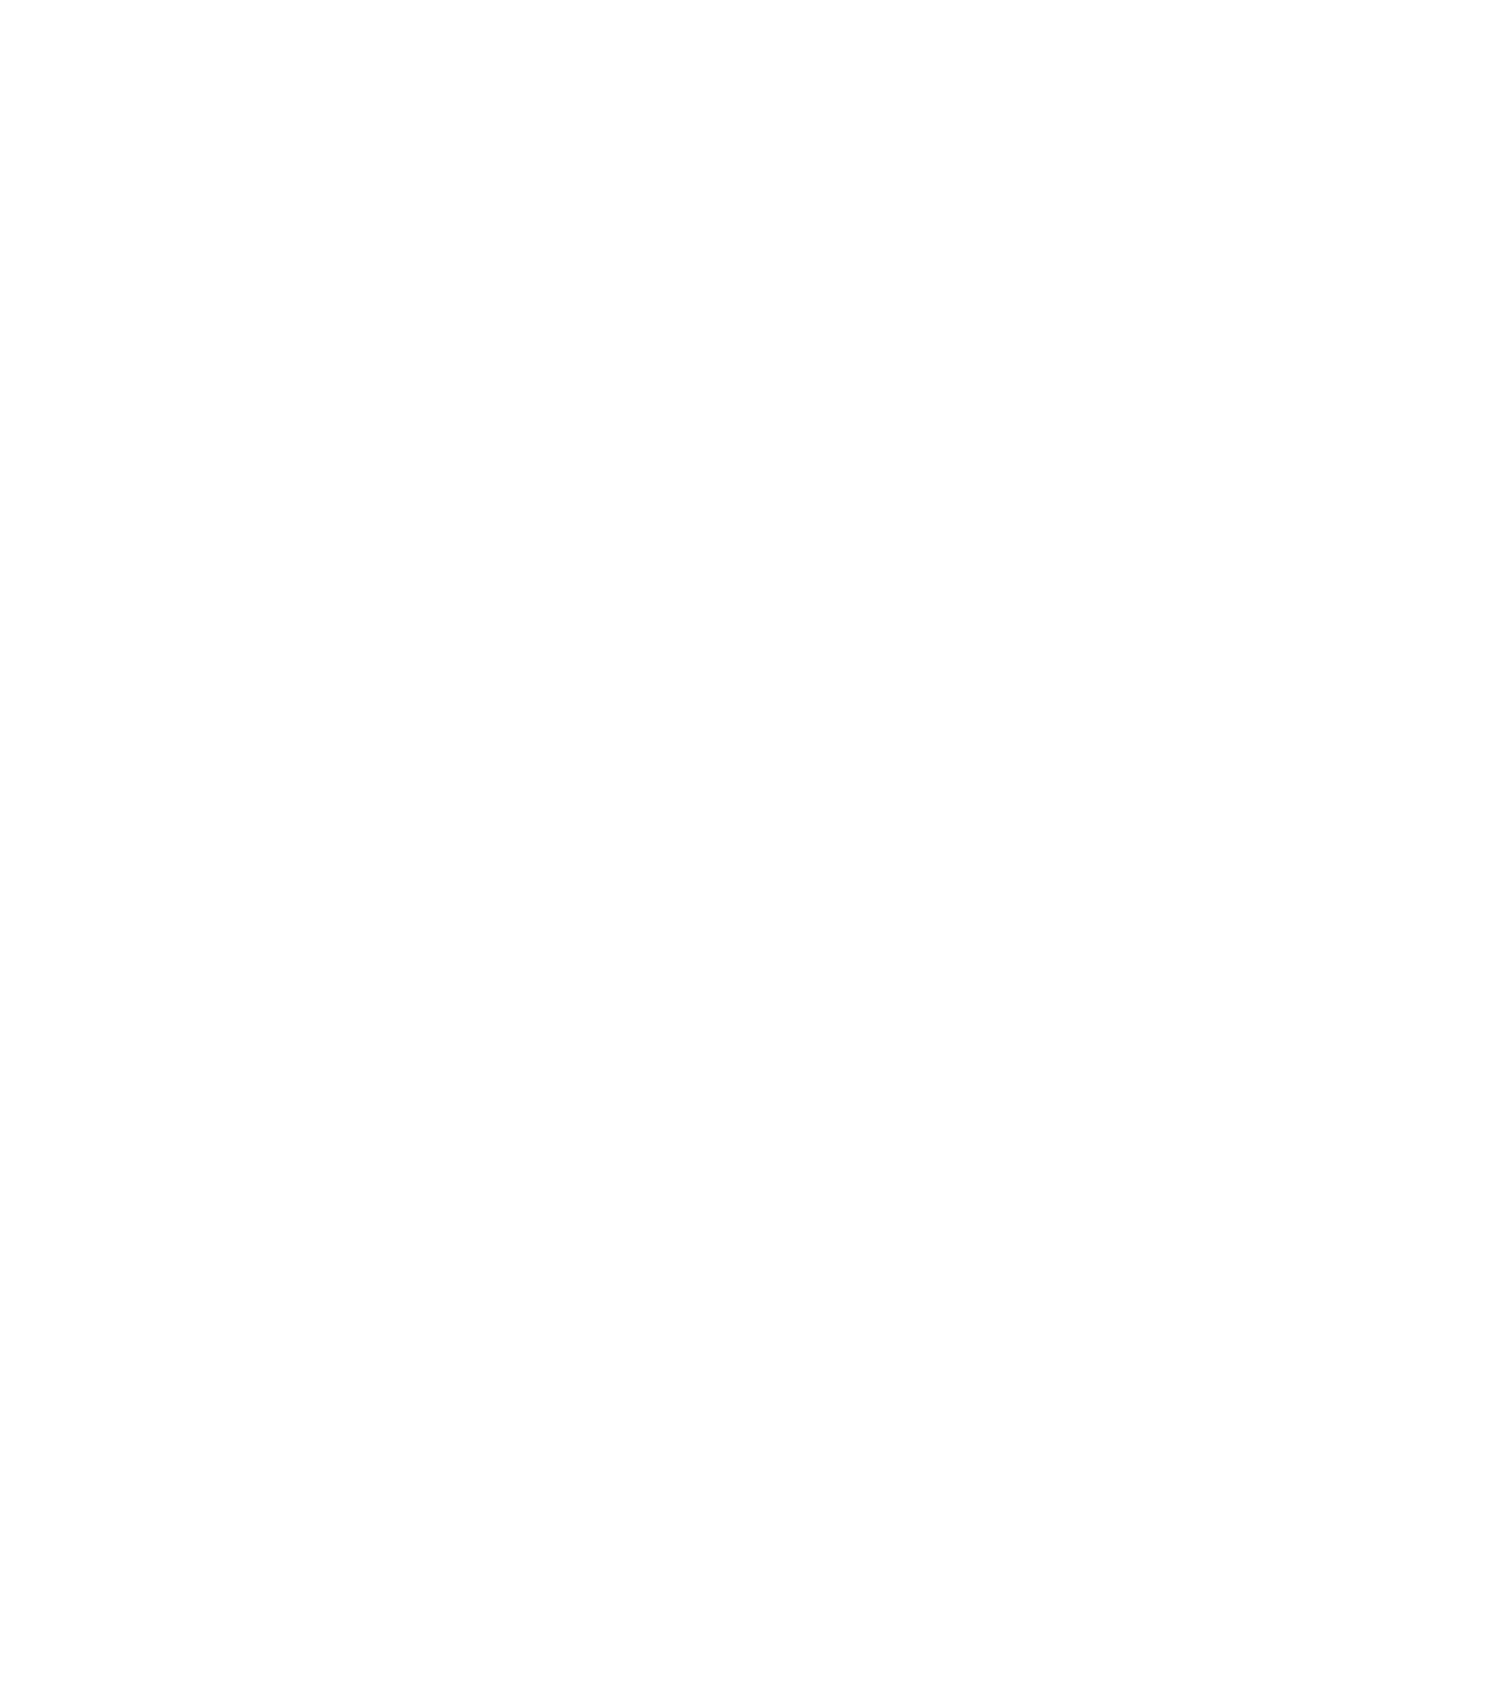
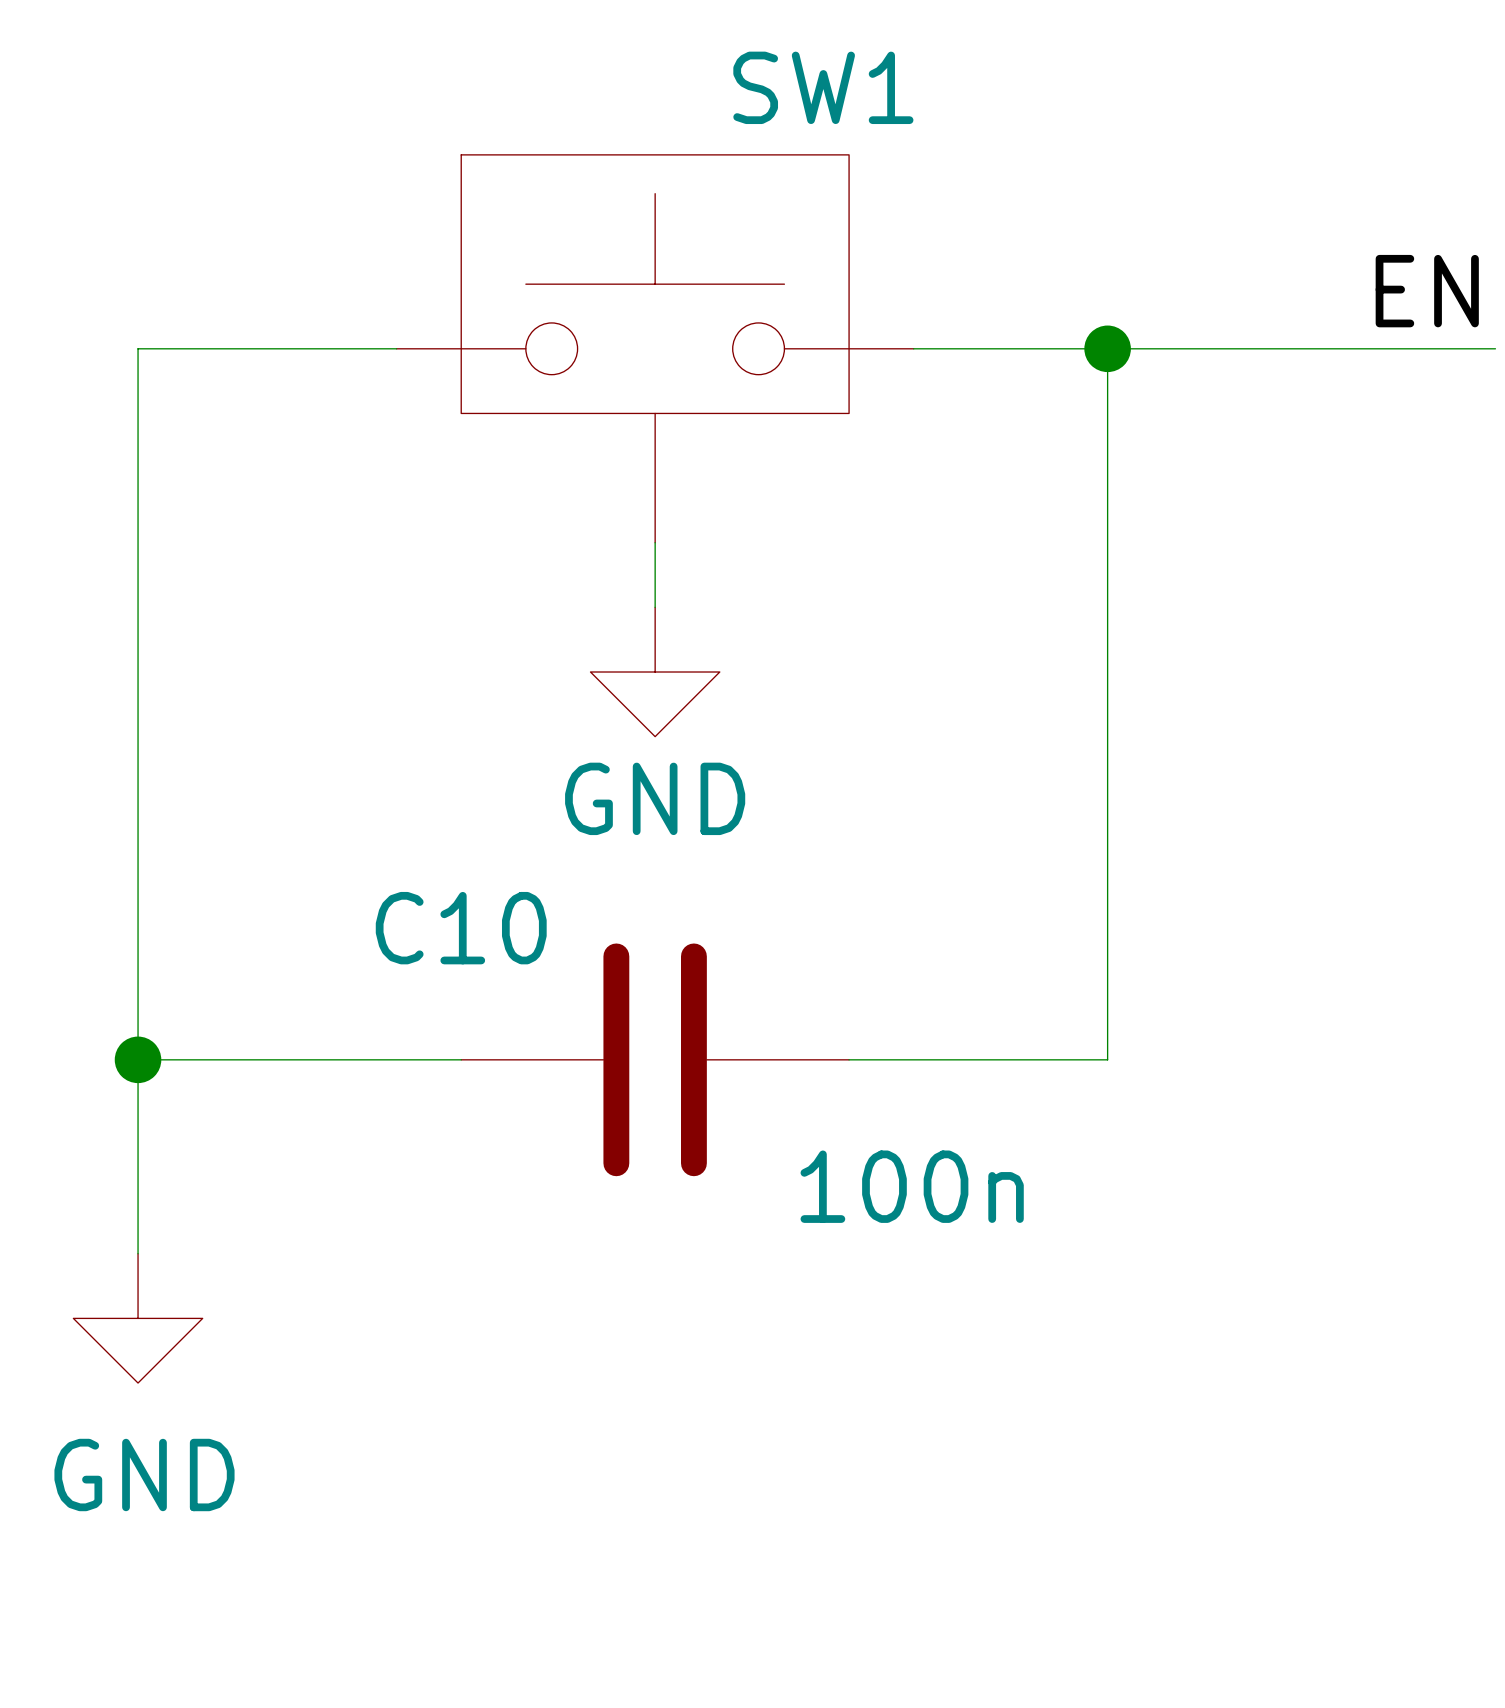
label: none -> EN (1427, 291)
wire: none -> (396, 348) (138, 348) (138, 1253)
SW1: none -> (655, 348)
wire: none -> (913, 348) (1495, 348)
wire: none -> (1107, 348) (1107, 1059) (849, 1059)
junction: none -> (1107, 348)
wire: none -> (655, 542) (655, 607)
power symbol: none -> GND (655, 672)
wire: none -> (138, 1059) (461, 1059)
junction: none -> (138, 1059)
C10: none -> 100n (655, 1059)
power symbol: none -> GND (138, 1318)

